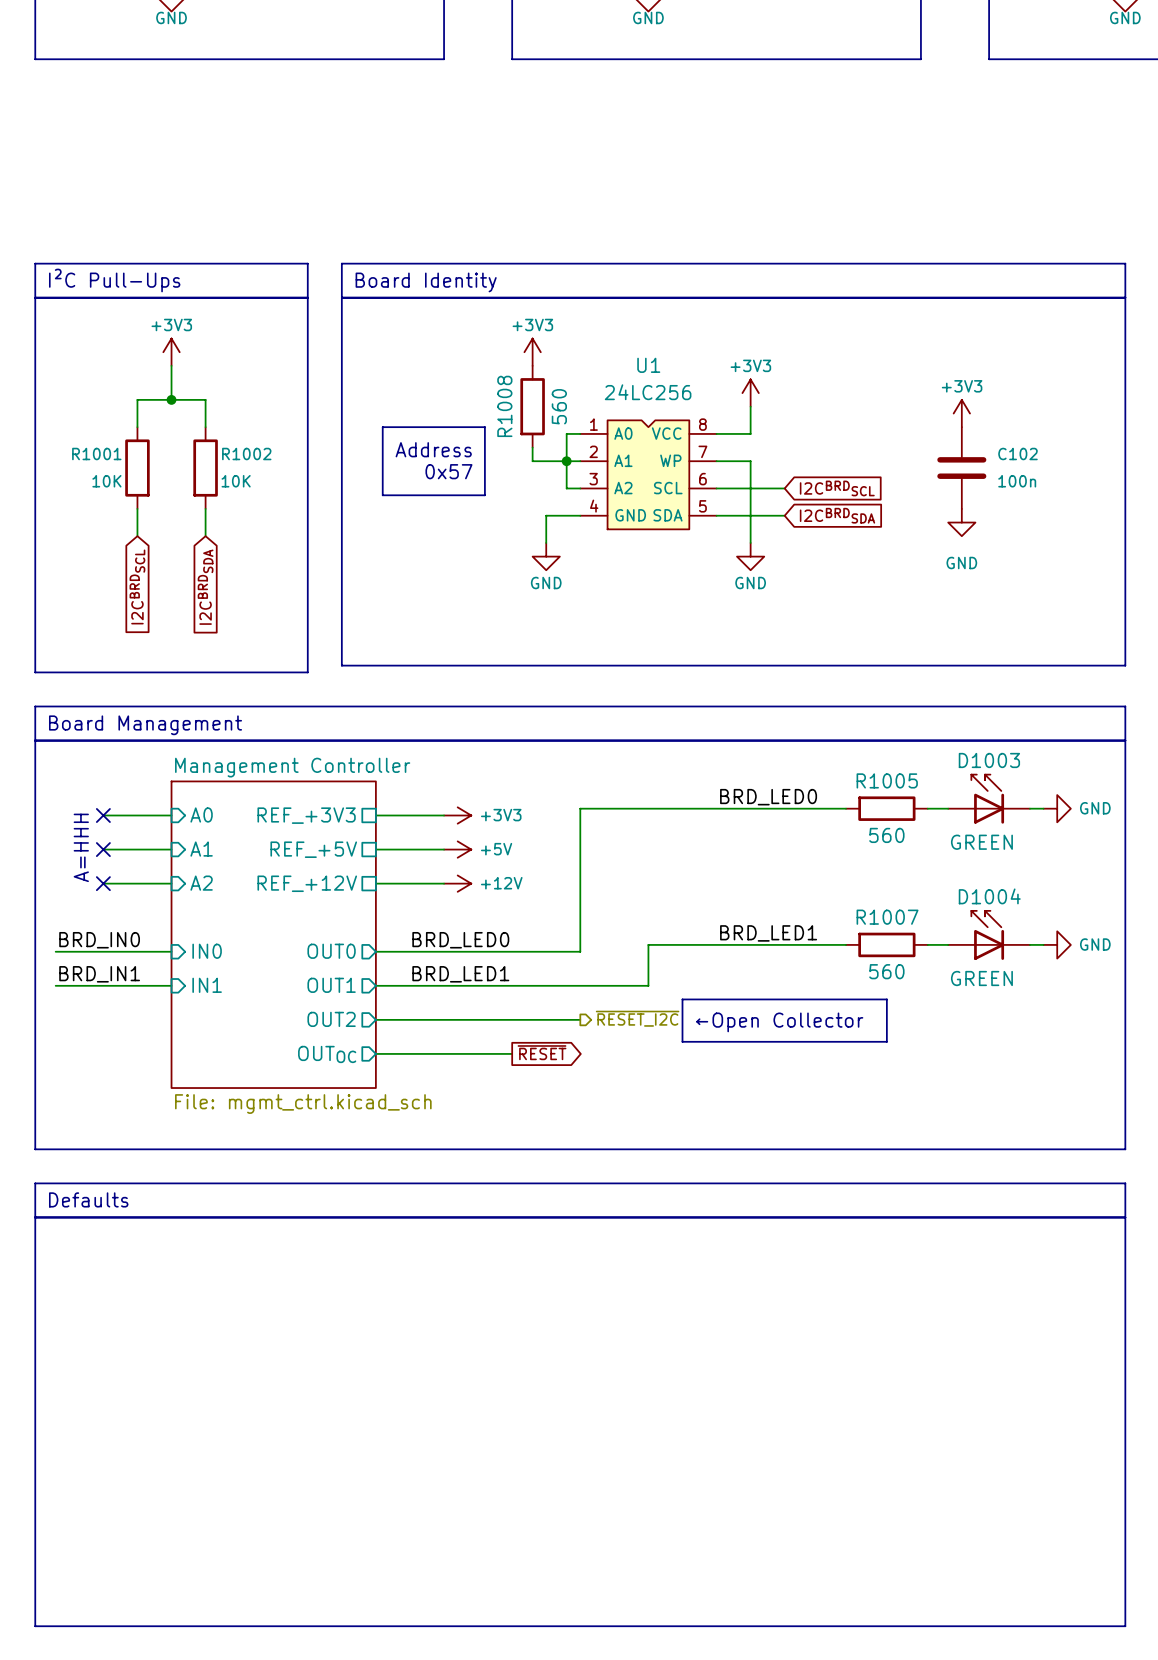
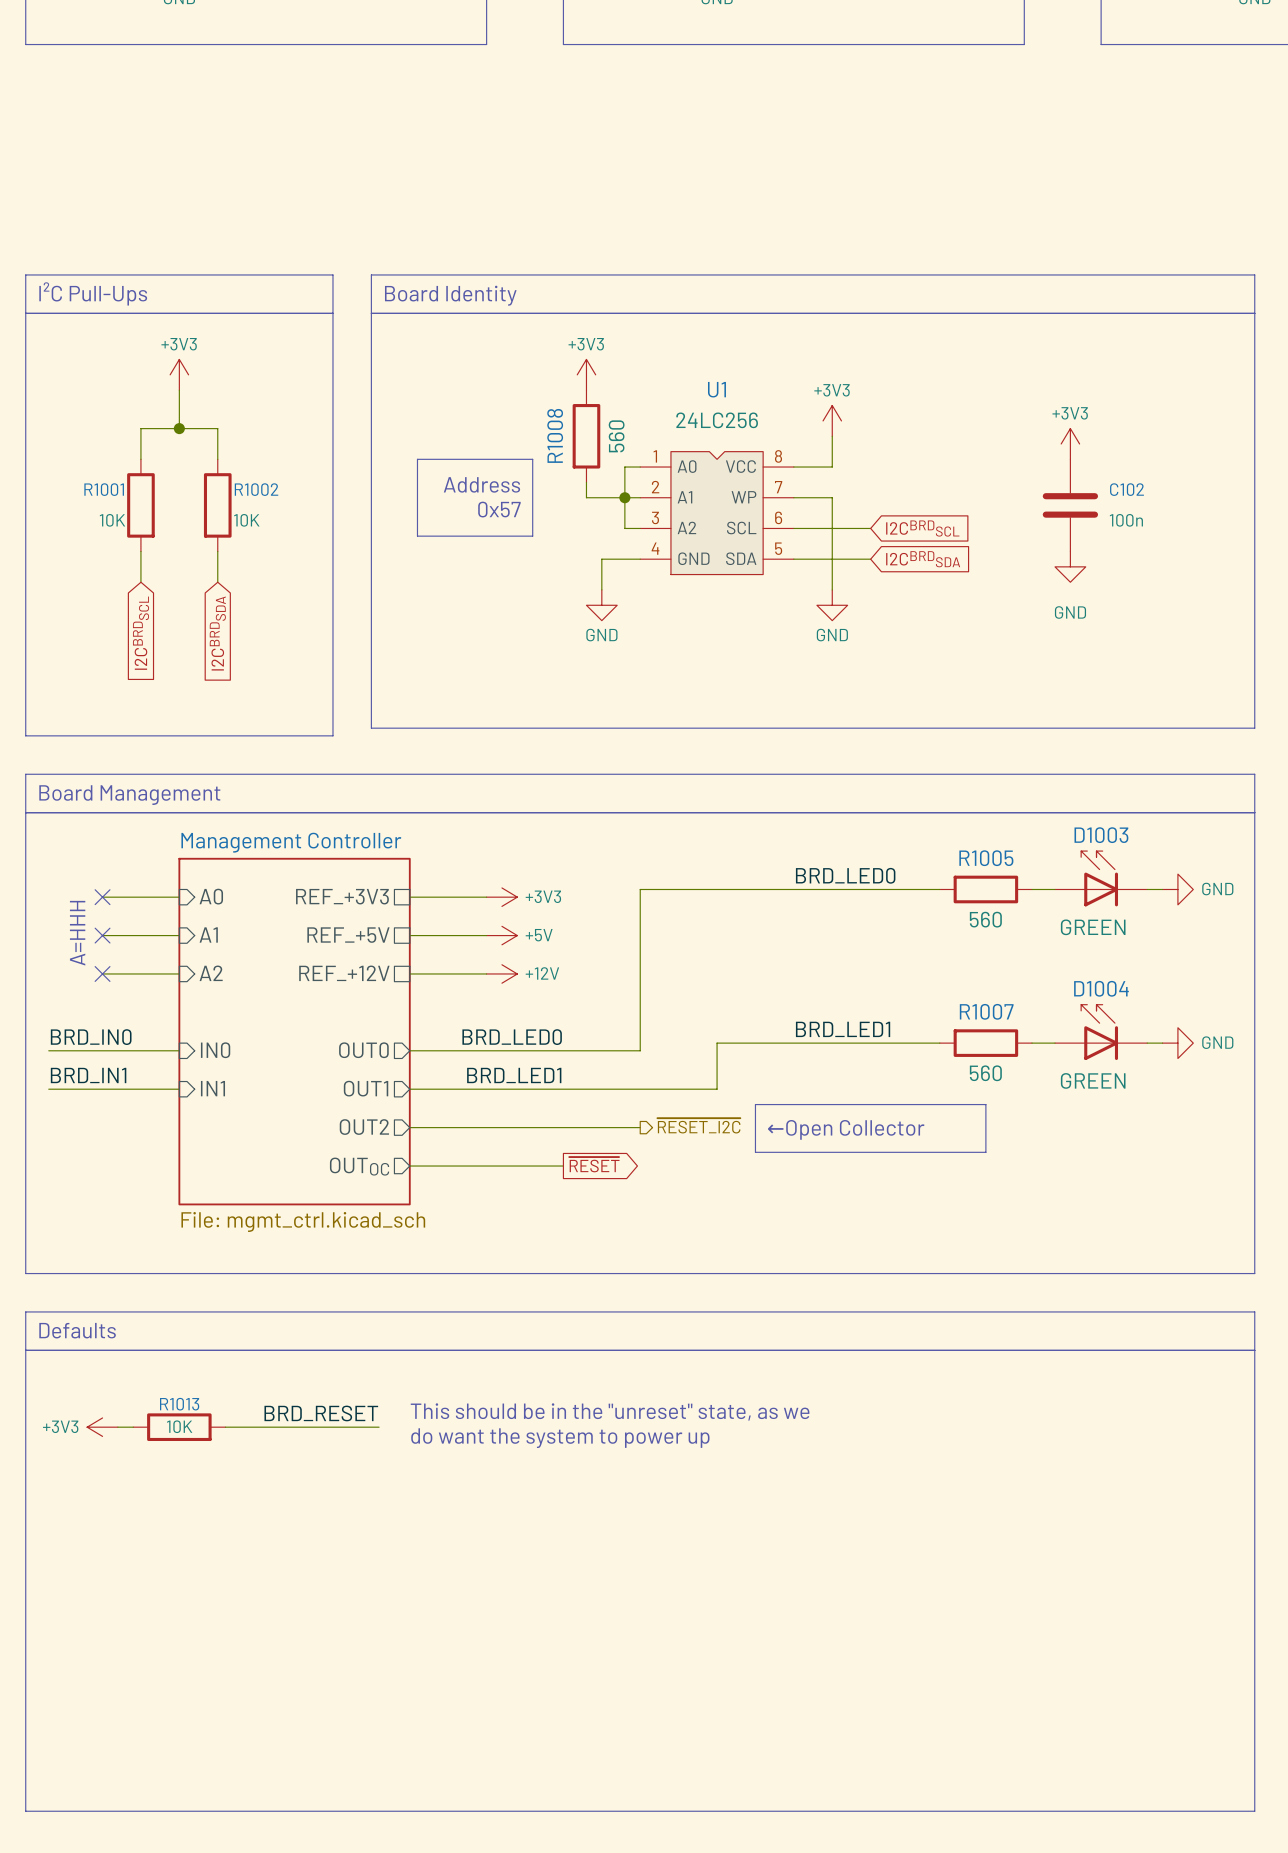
text: none -> This should be in the "unreset" state, as we (610, 1411)
label: none -> BRD_RESET (321, 1413)
power symbol: none -> +3V3 (102, 1427)
wire: none -> (117, 1427) (133, 1427)
R1013: none -> 10K (179, 1427)
wire: none -> (225, 1427) (379, 1427)
text: none -> do want the system to power up (560, 1438)

